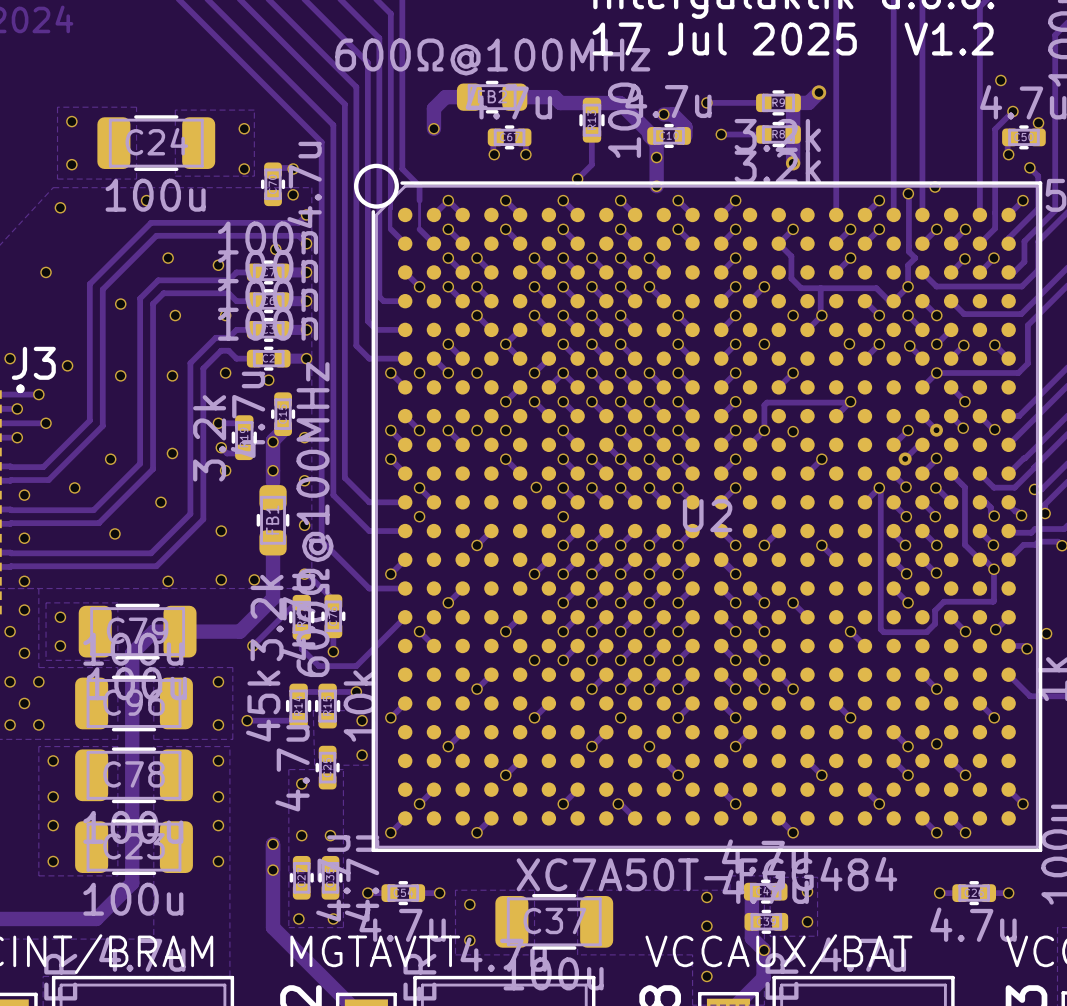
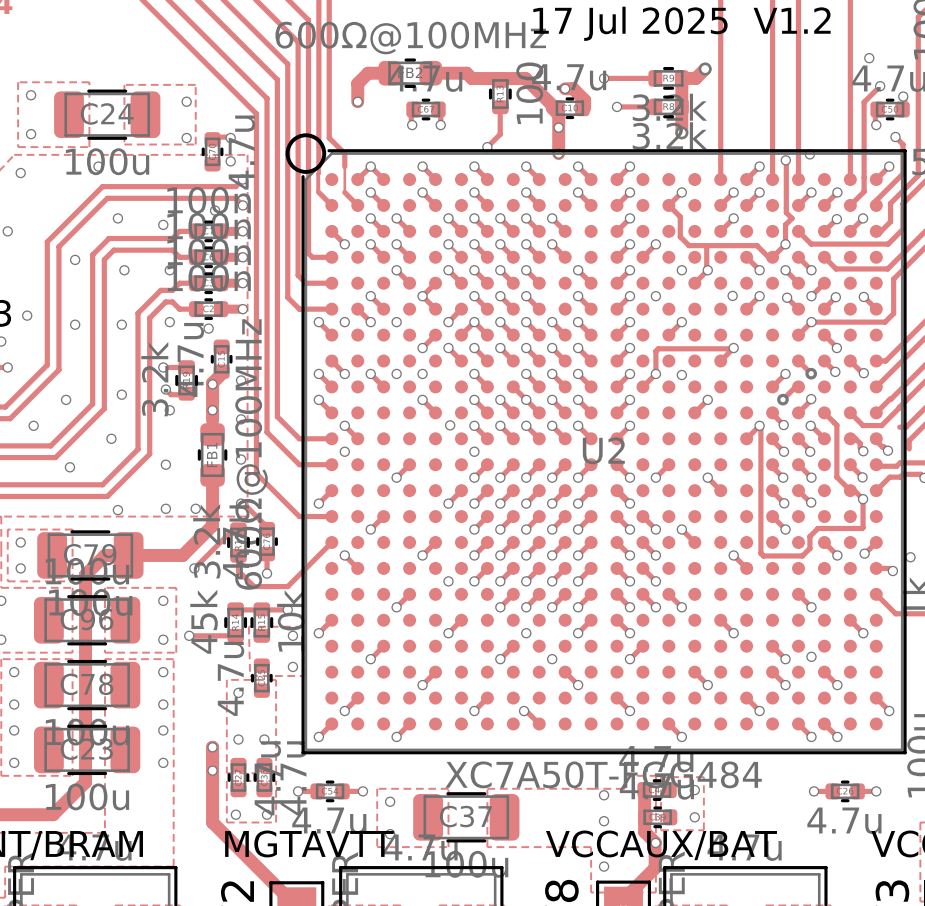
via: (1034, 489) -> none
via: (1045, 513) -> none

